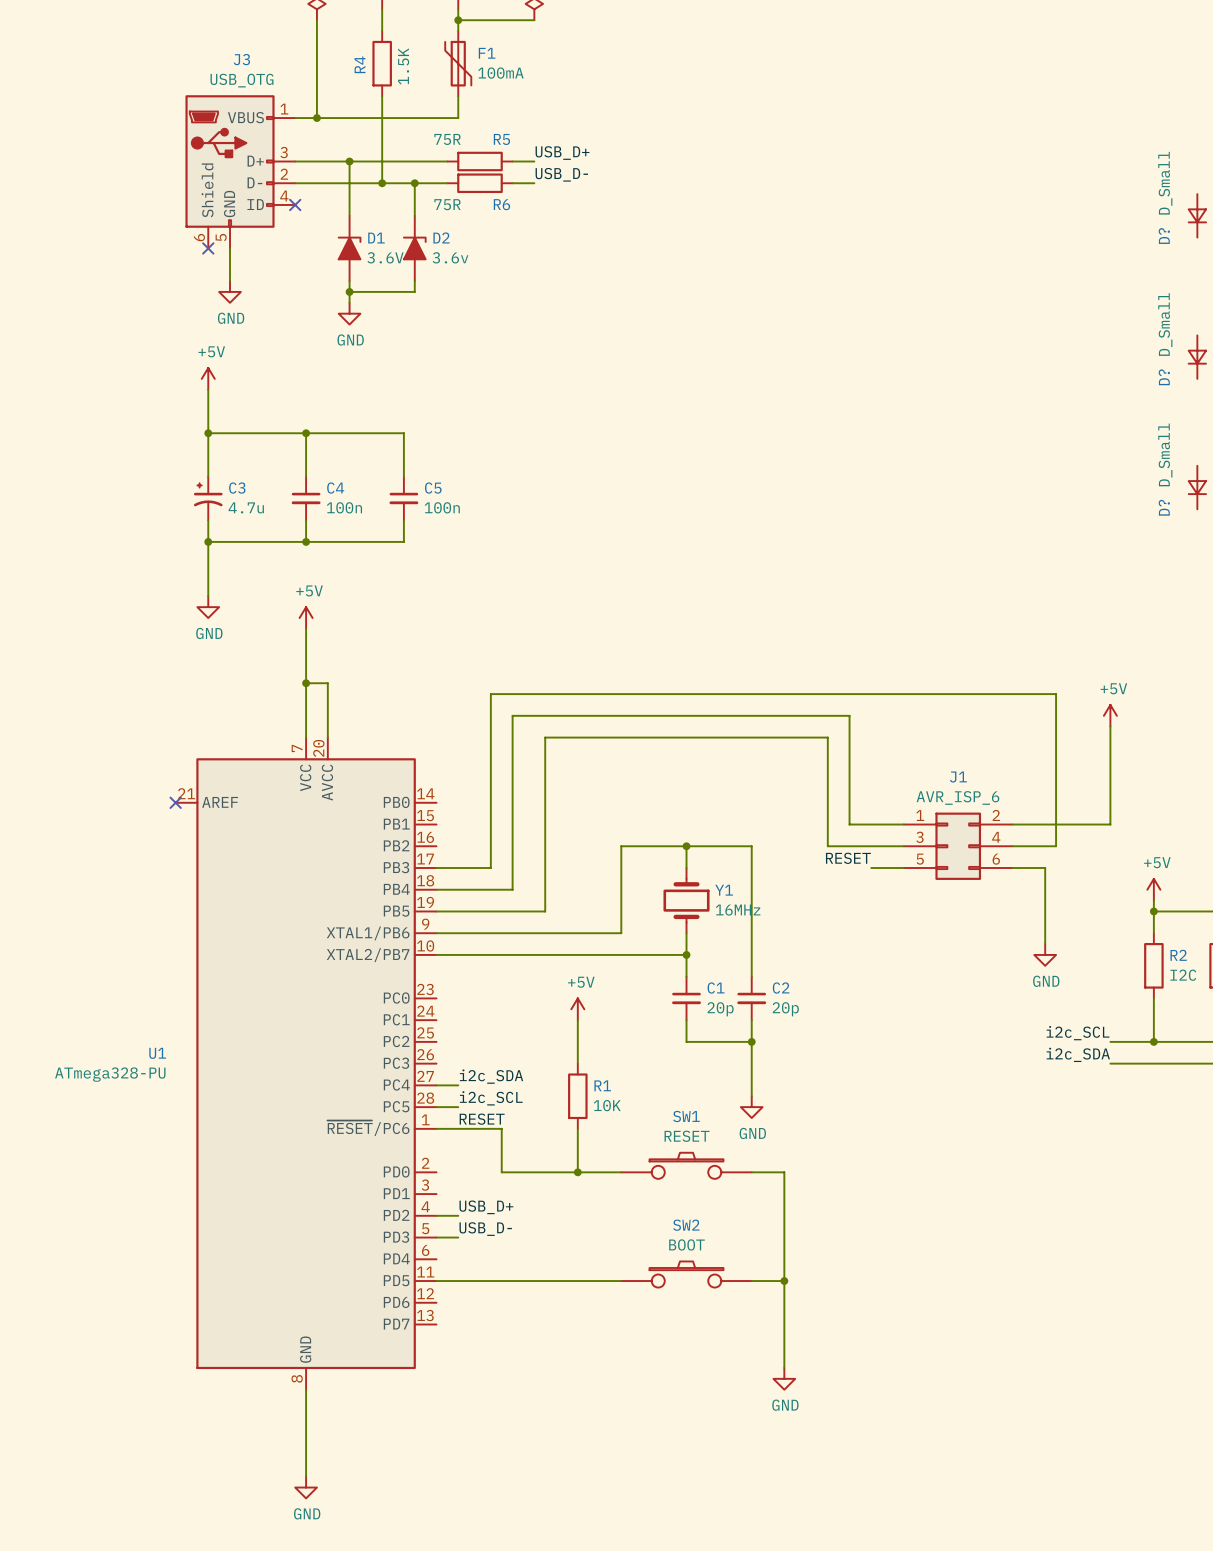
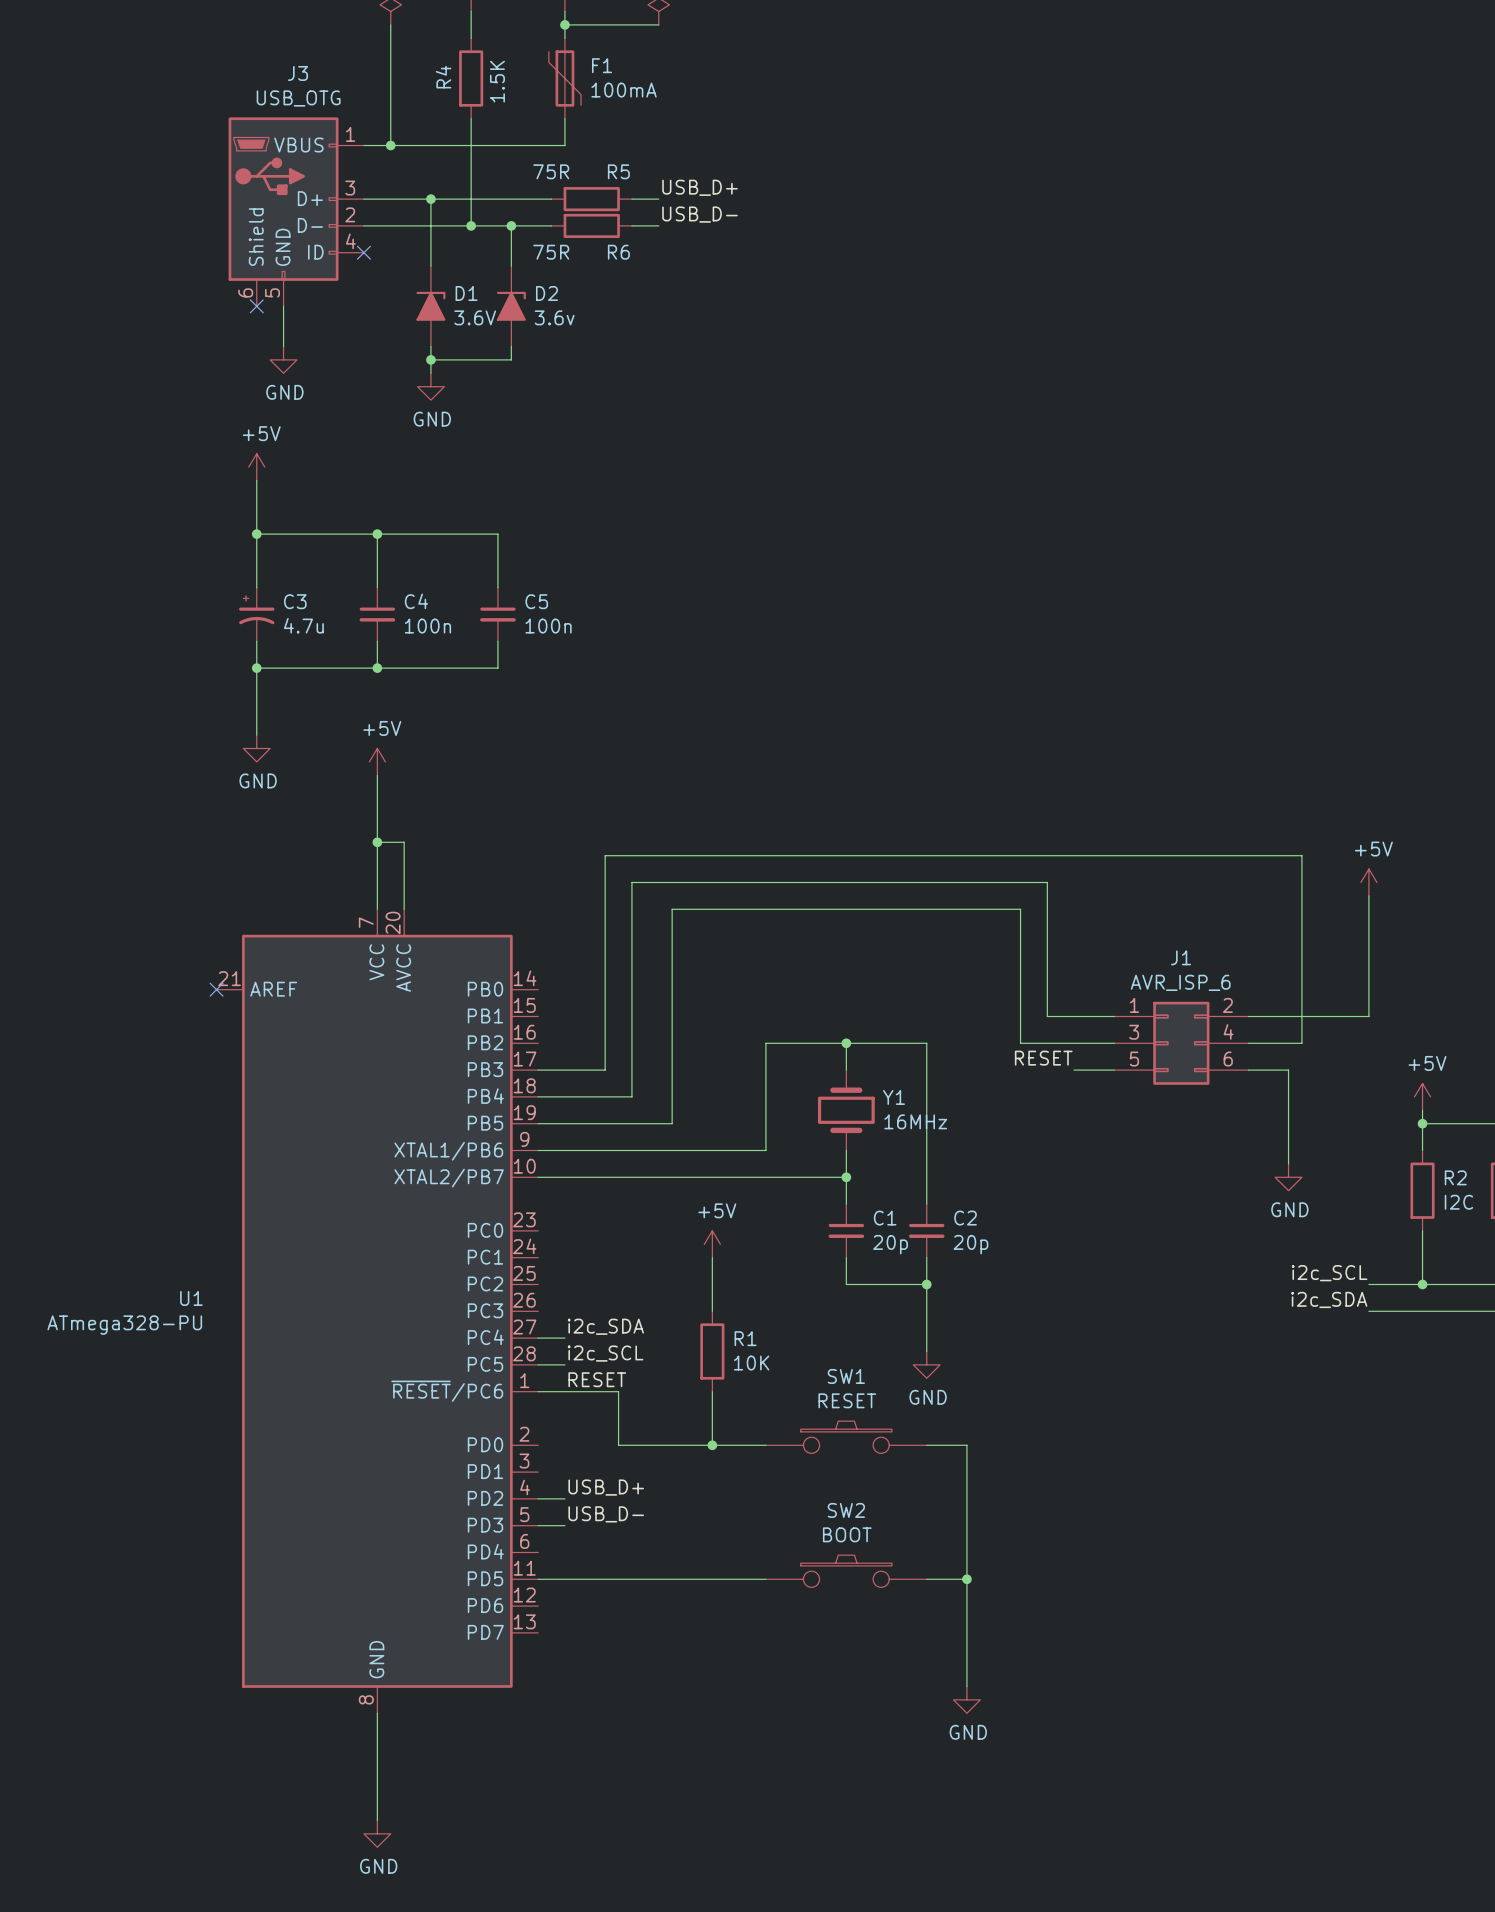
D?: D_Small (1197, 215) -> none
D?: D_Small (1197, 357) -> none
D?: D_Small (1197, 487) -> none

